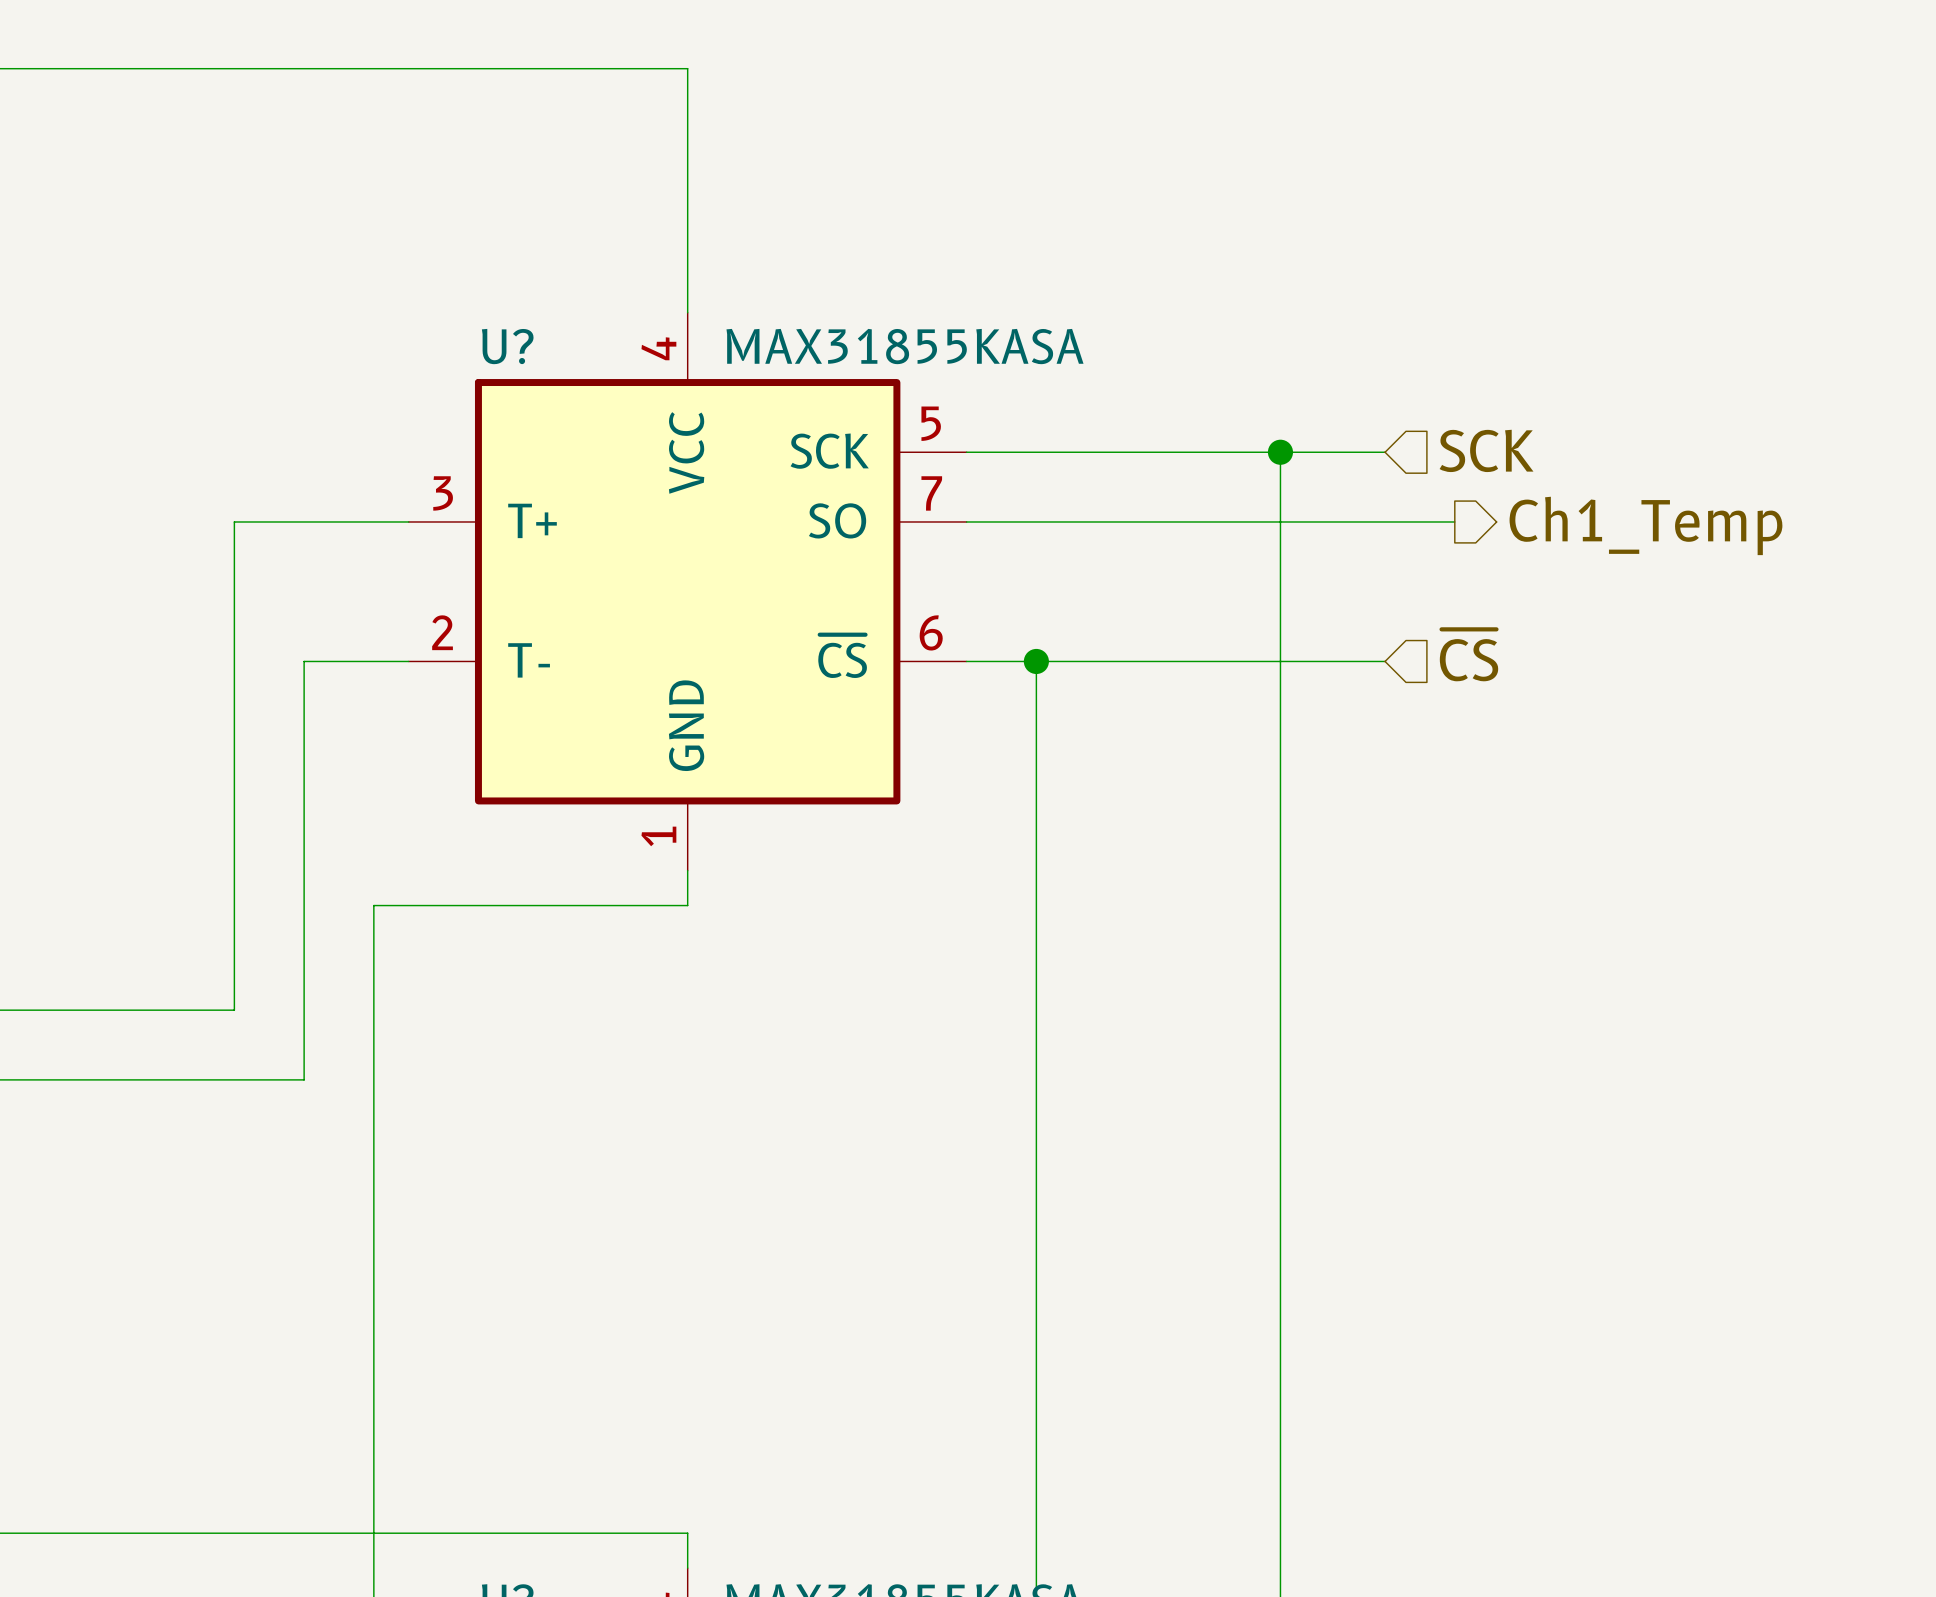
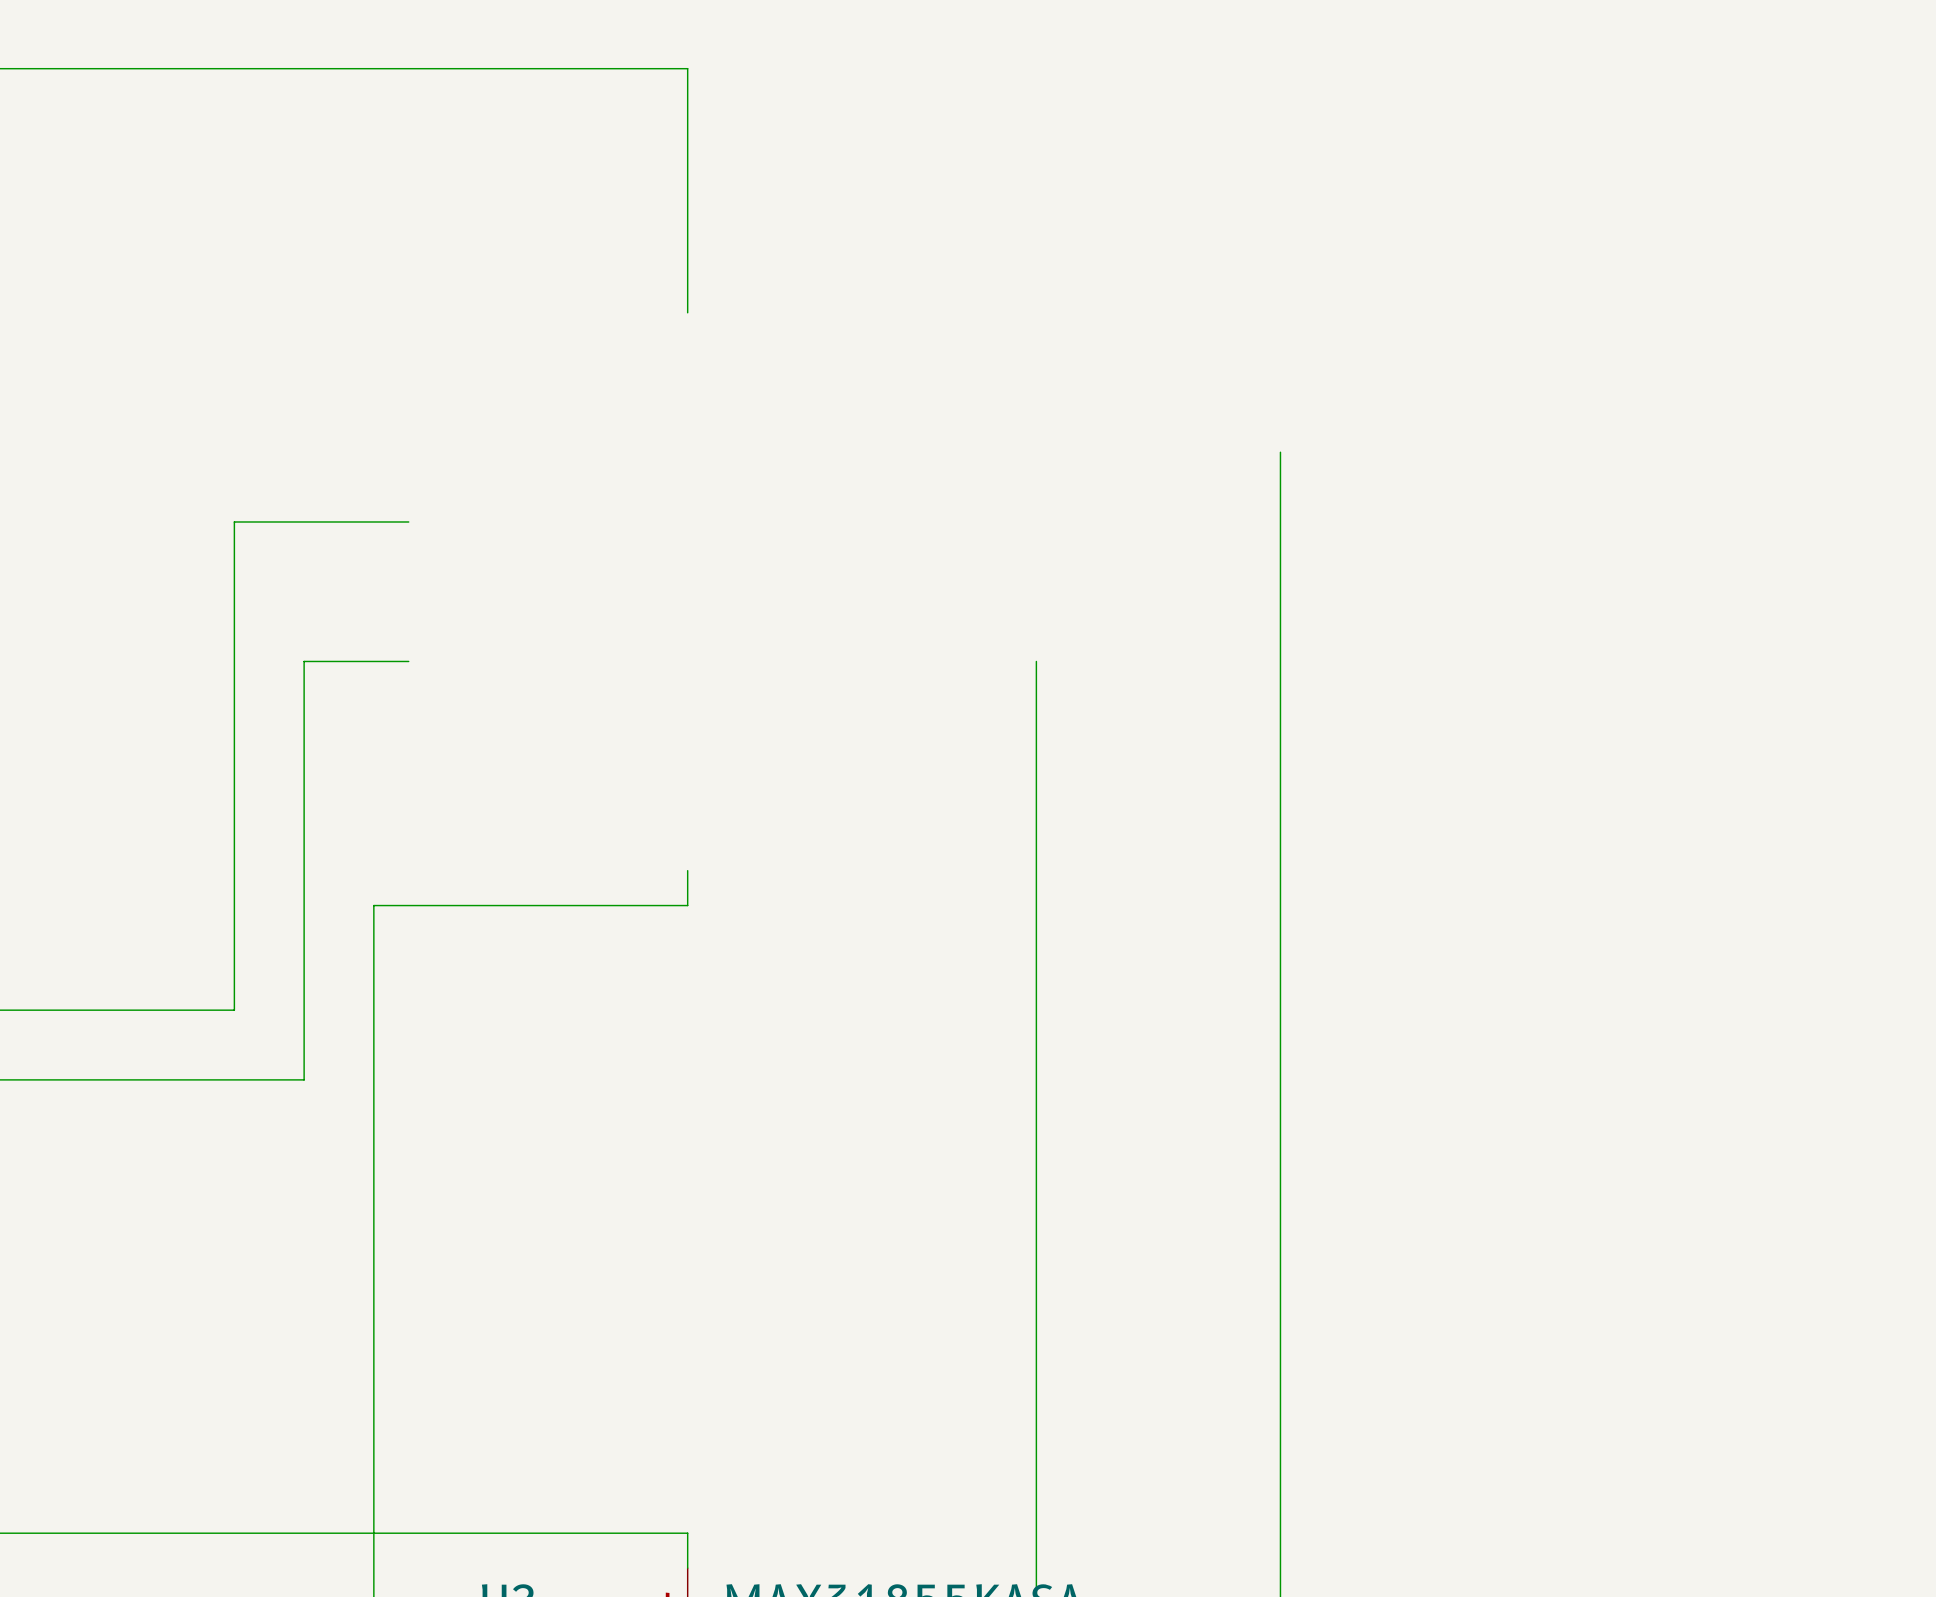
hierarchical label: SCK (1486, 450) -> none
wire: (966, 452) (1385, 452) -> none
junction: (1280, 452) -> none
wire: (966, 521) (1454, 521) -> none
hierarchical label: Ch1_Temp (1645, 525) -> none
U?: MAX31855KASA (687, 591) -> none
hierarchical label: ~{CS} (1469, 655) -> none
wire: (966, 661) (1385, 661) -> none
junction: (1036, 661) -> none

